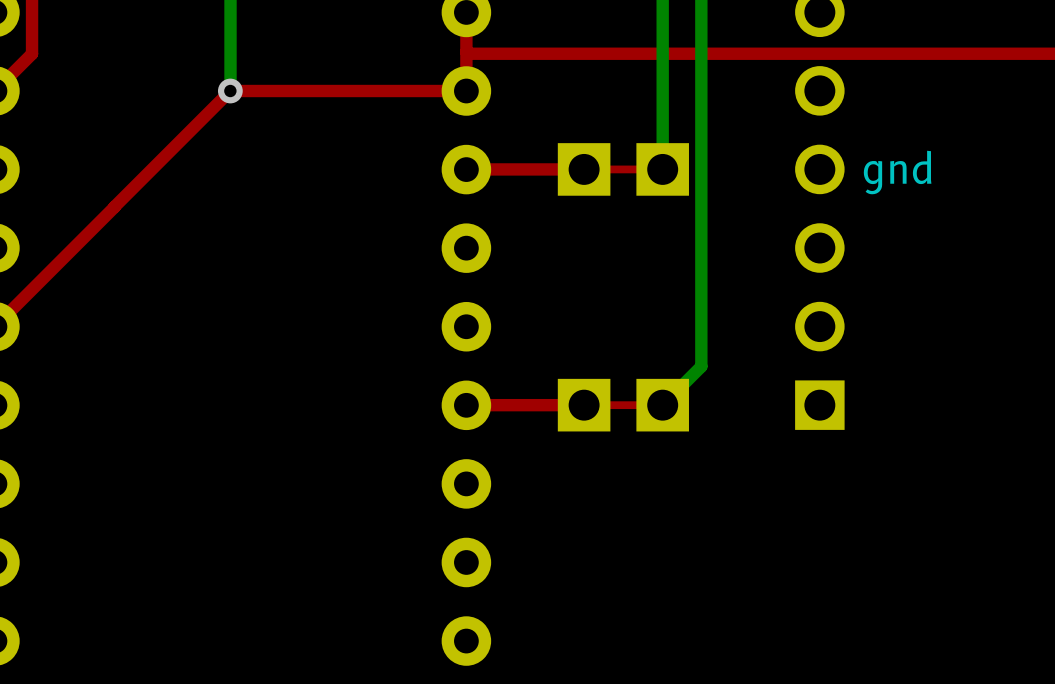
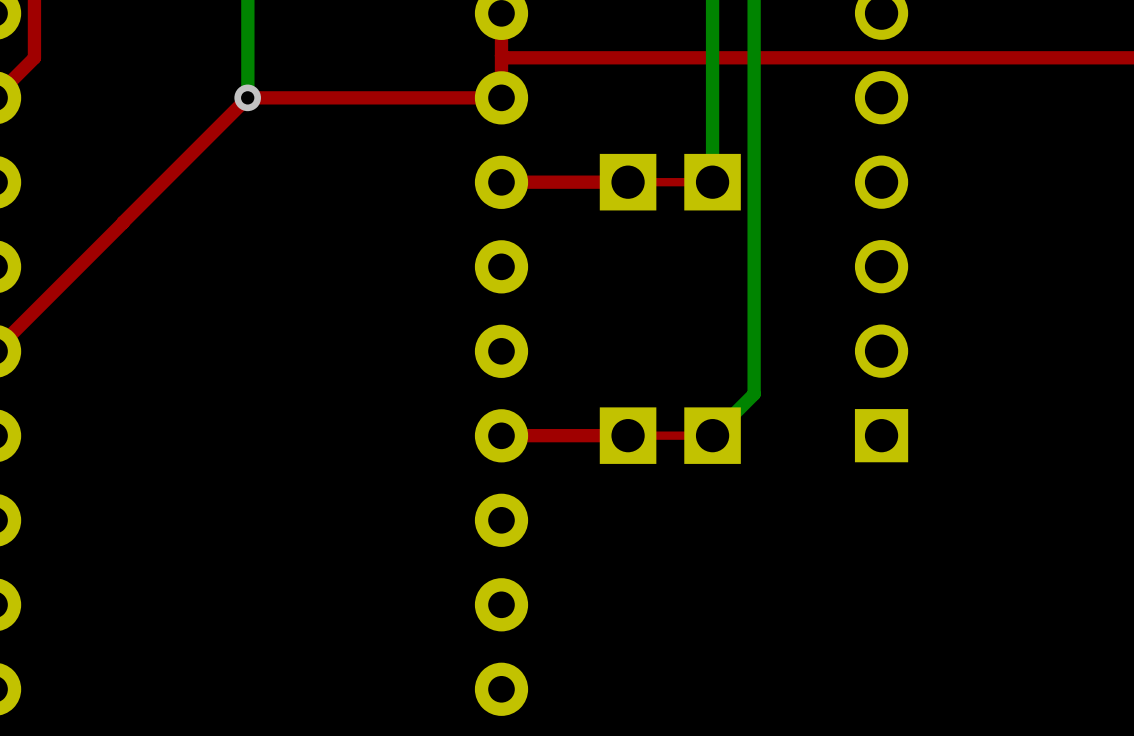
text: gnd (897, 172) -> none

